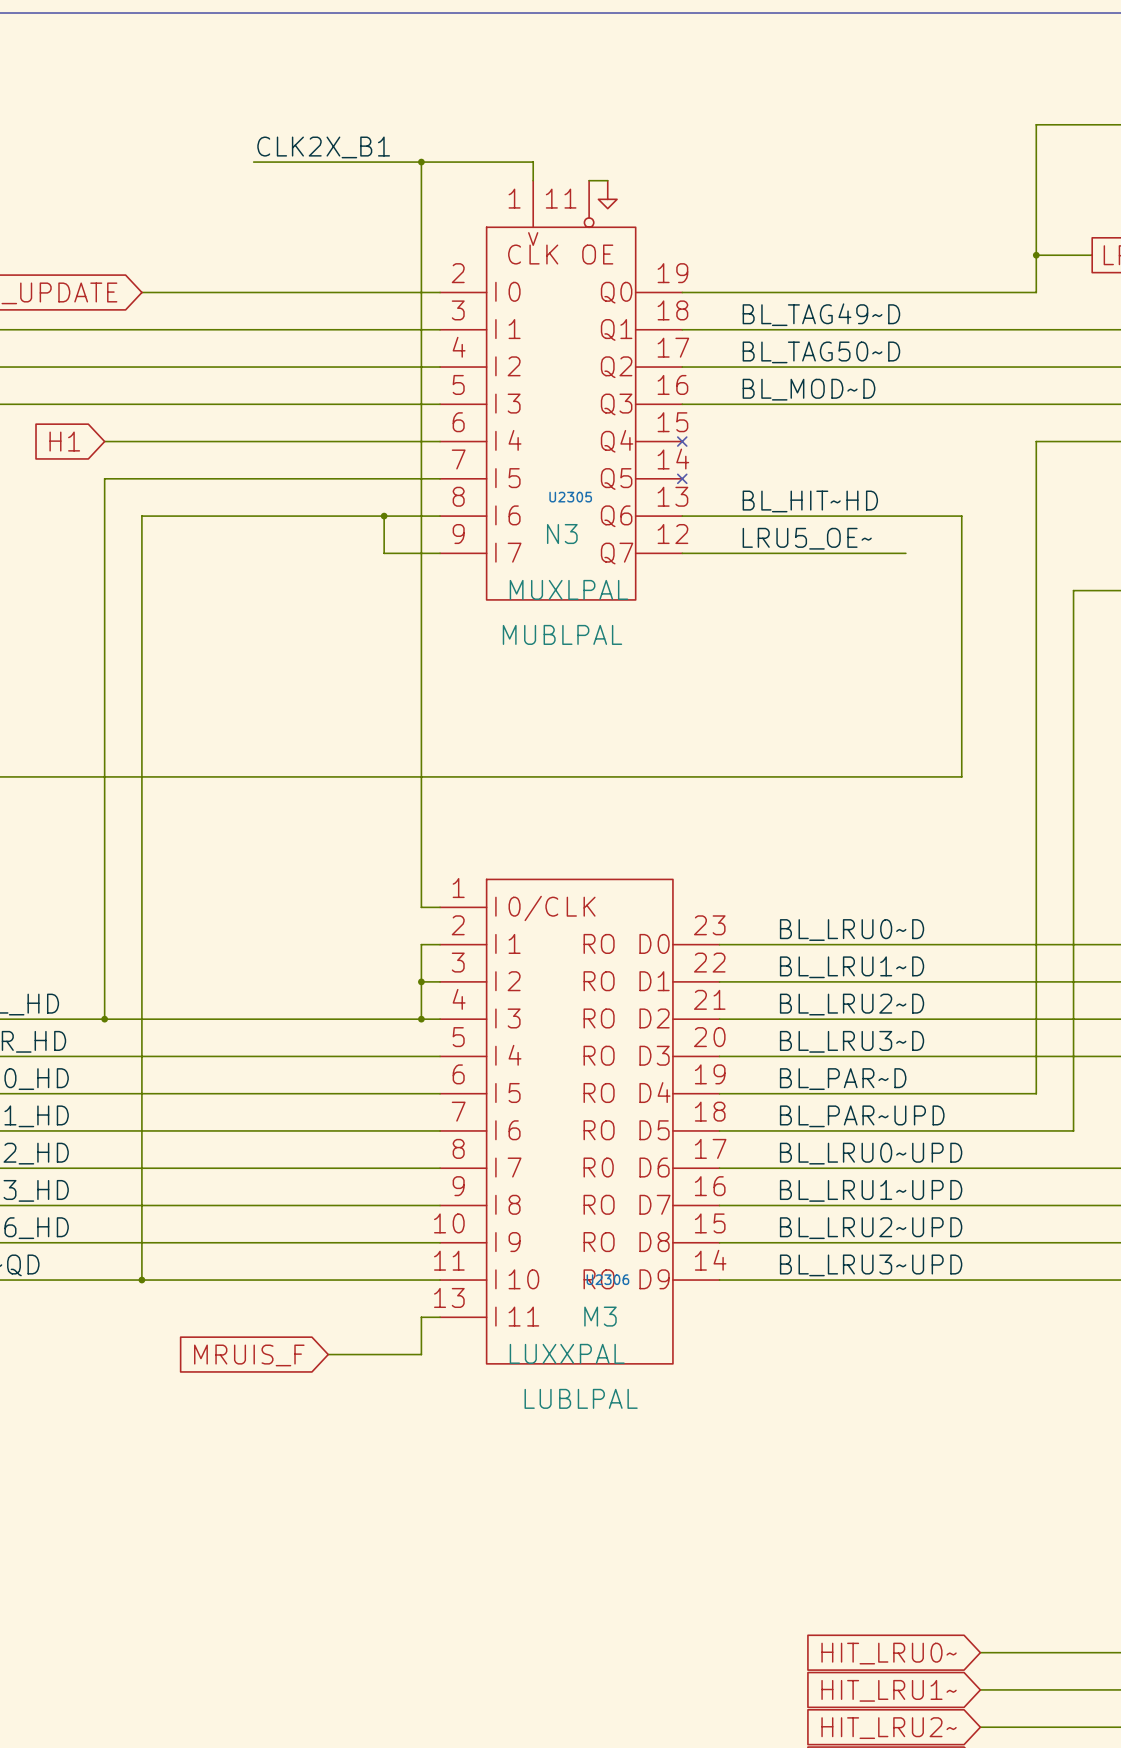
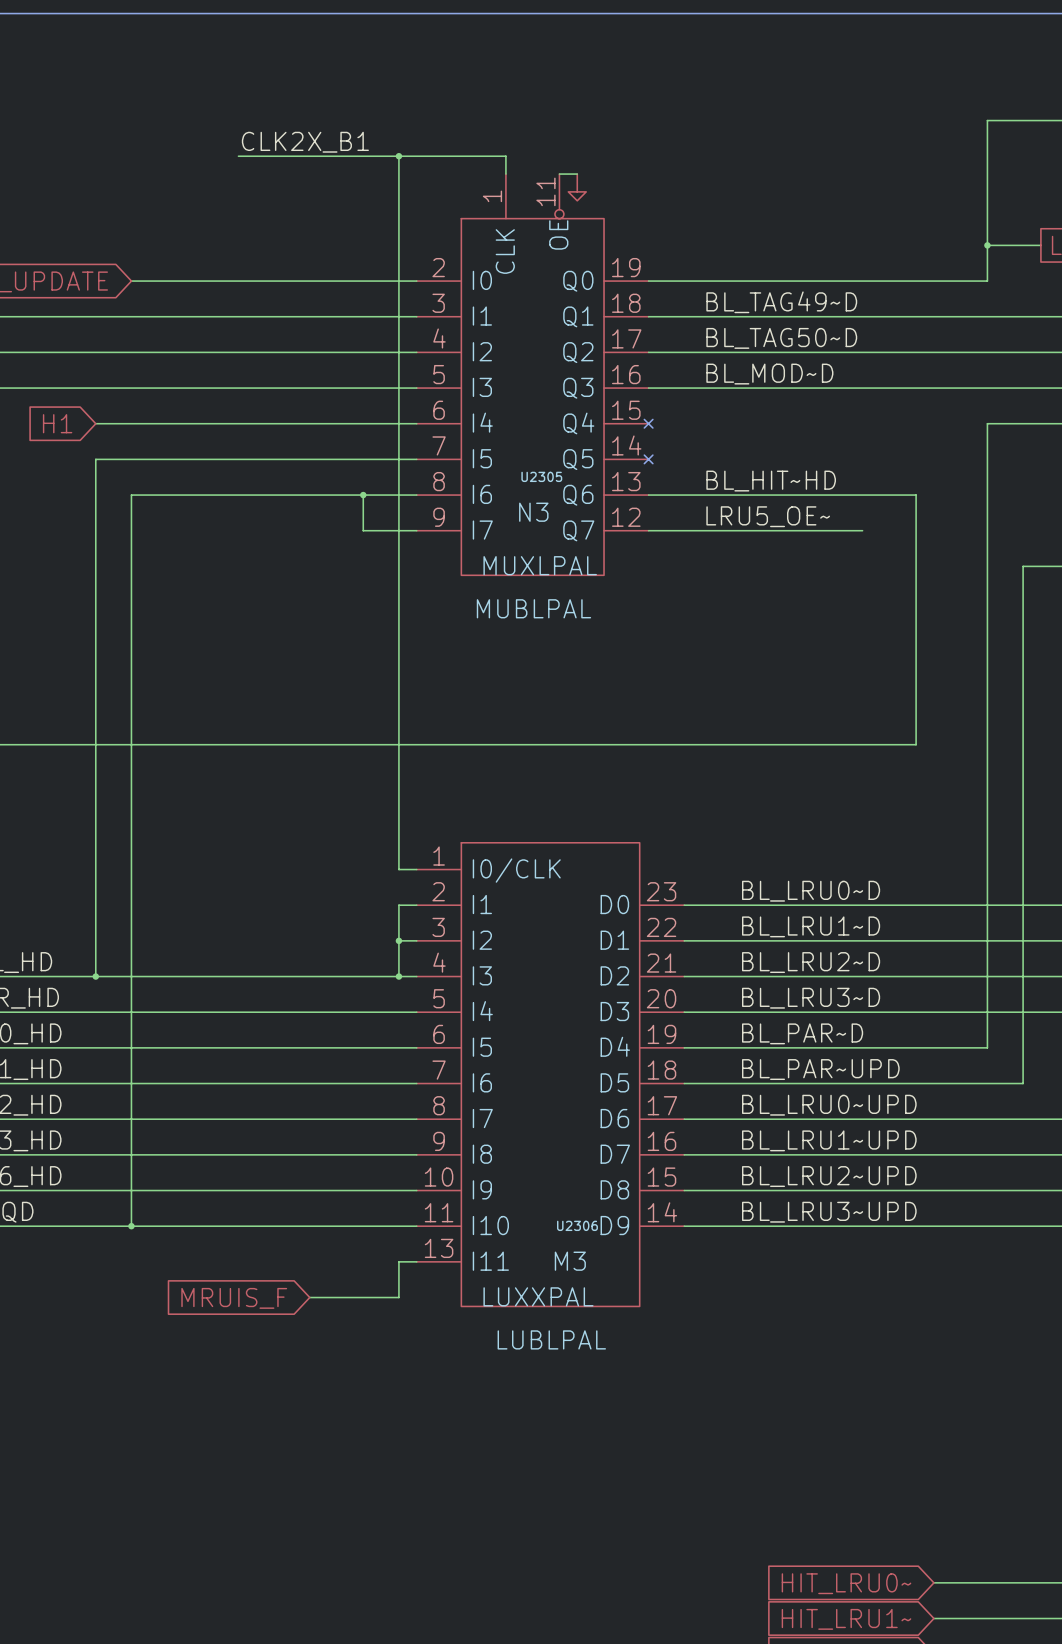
U2305 symbol: [440, 180, 683, 600] -> [416, 174, 649, 576]
U2306 symbol: [440, 879, 720, 1364] -> [416, 842, 685, 1307]

